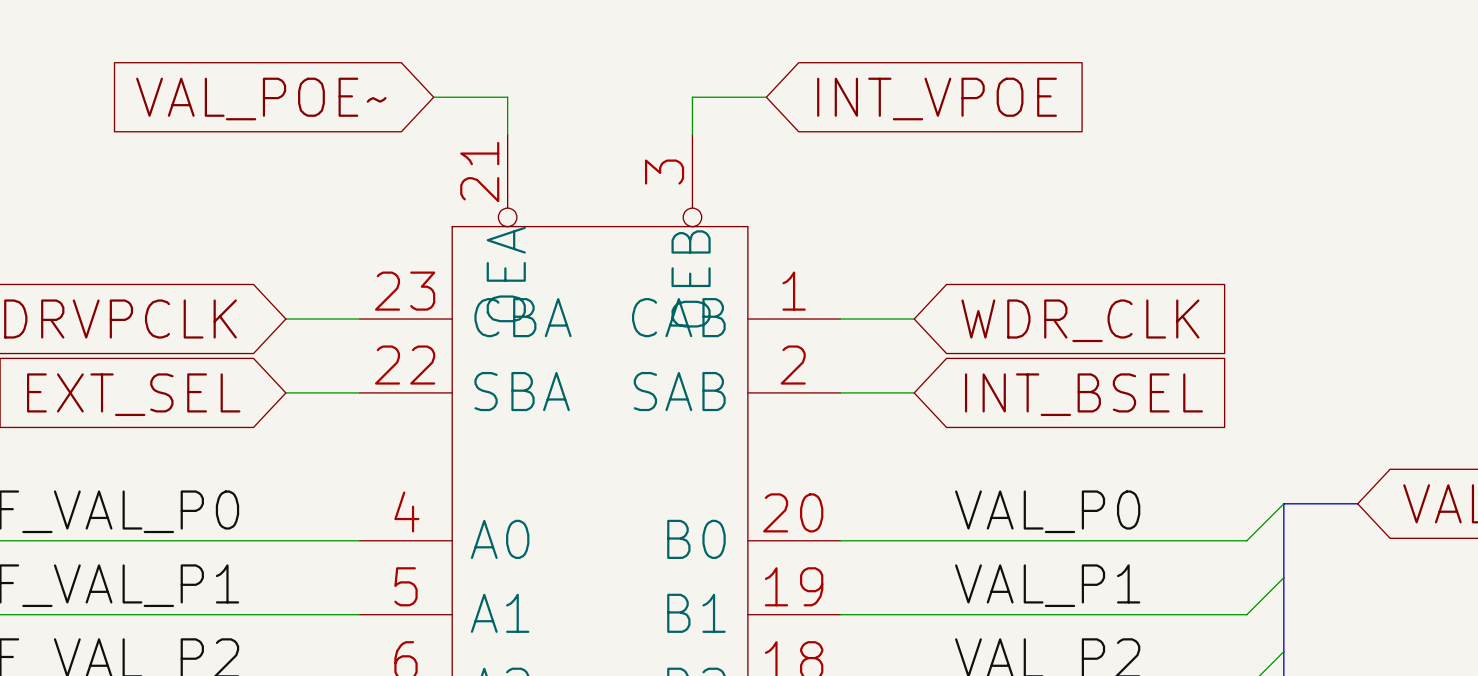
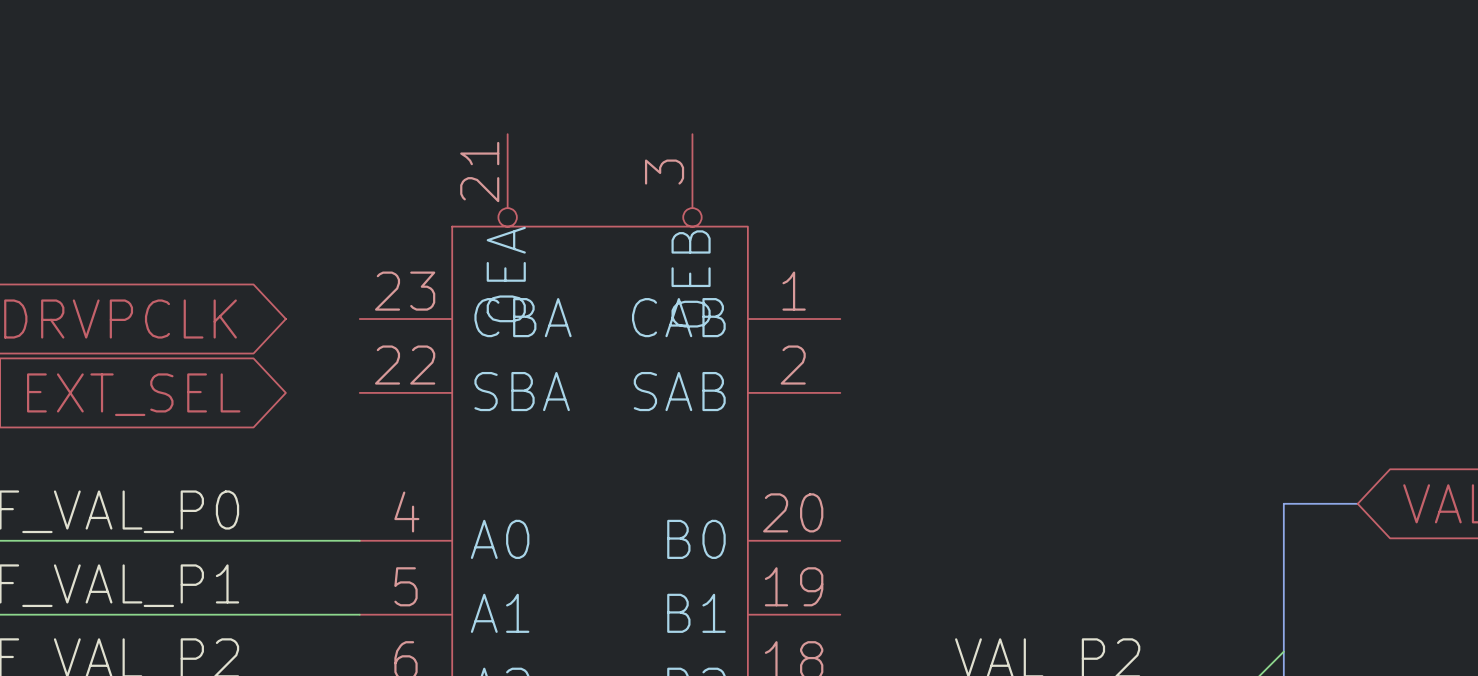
wire: (433, 97) (507, 97) (507, 134) -> none
wire: (766, 97) (692, 97) (692, 134) -> none
global label: VAL_POE~ (261, 99) -> none
global label: INT_VPOE (937, 99) -> none
wire: (285, 319) (359, 319) -> none
wire: (840, 319) (914, 319) -> none
global label: WDR_CLK (1080, 320) -> none
wire: (285, 392) (359, 392) -> none
wire: (840, 392) (914, 392) -> none
global label: INT_BSEL (1083, 394) -> none
wire: (1283, 503) (1246, 540) (840, 540) -> none
label: VAL_P0 (1047, 511) -> none
wire: (1283, 577) (1246, 614) (840, 614) -> none
label: VAL_P1 (1047, 585) -> none

